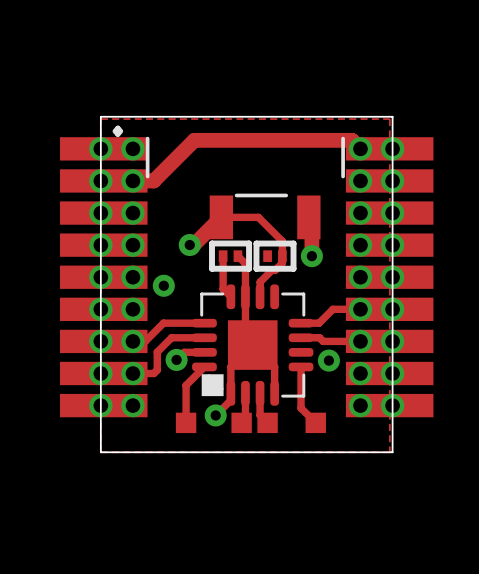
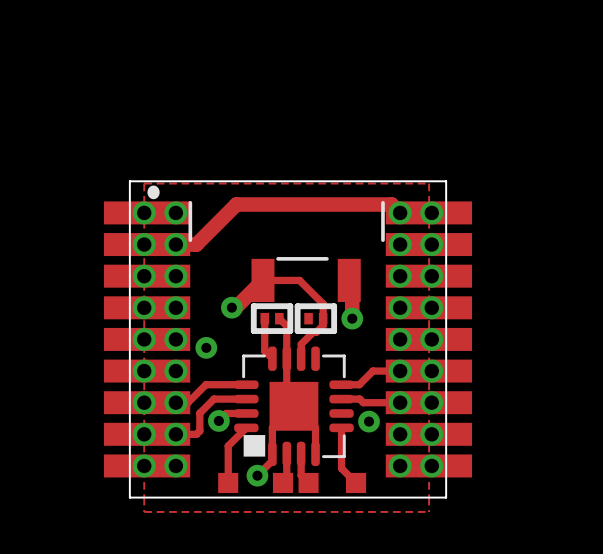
board edge: (100, 116) (100, 452) (392, 452) (392, 116) -> (144, 181) (129, 181) (129, 497) (446, 497) (446, 181) (431, 181)

